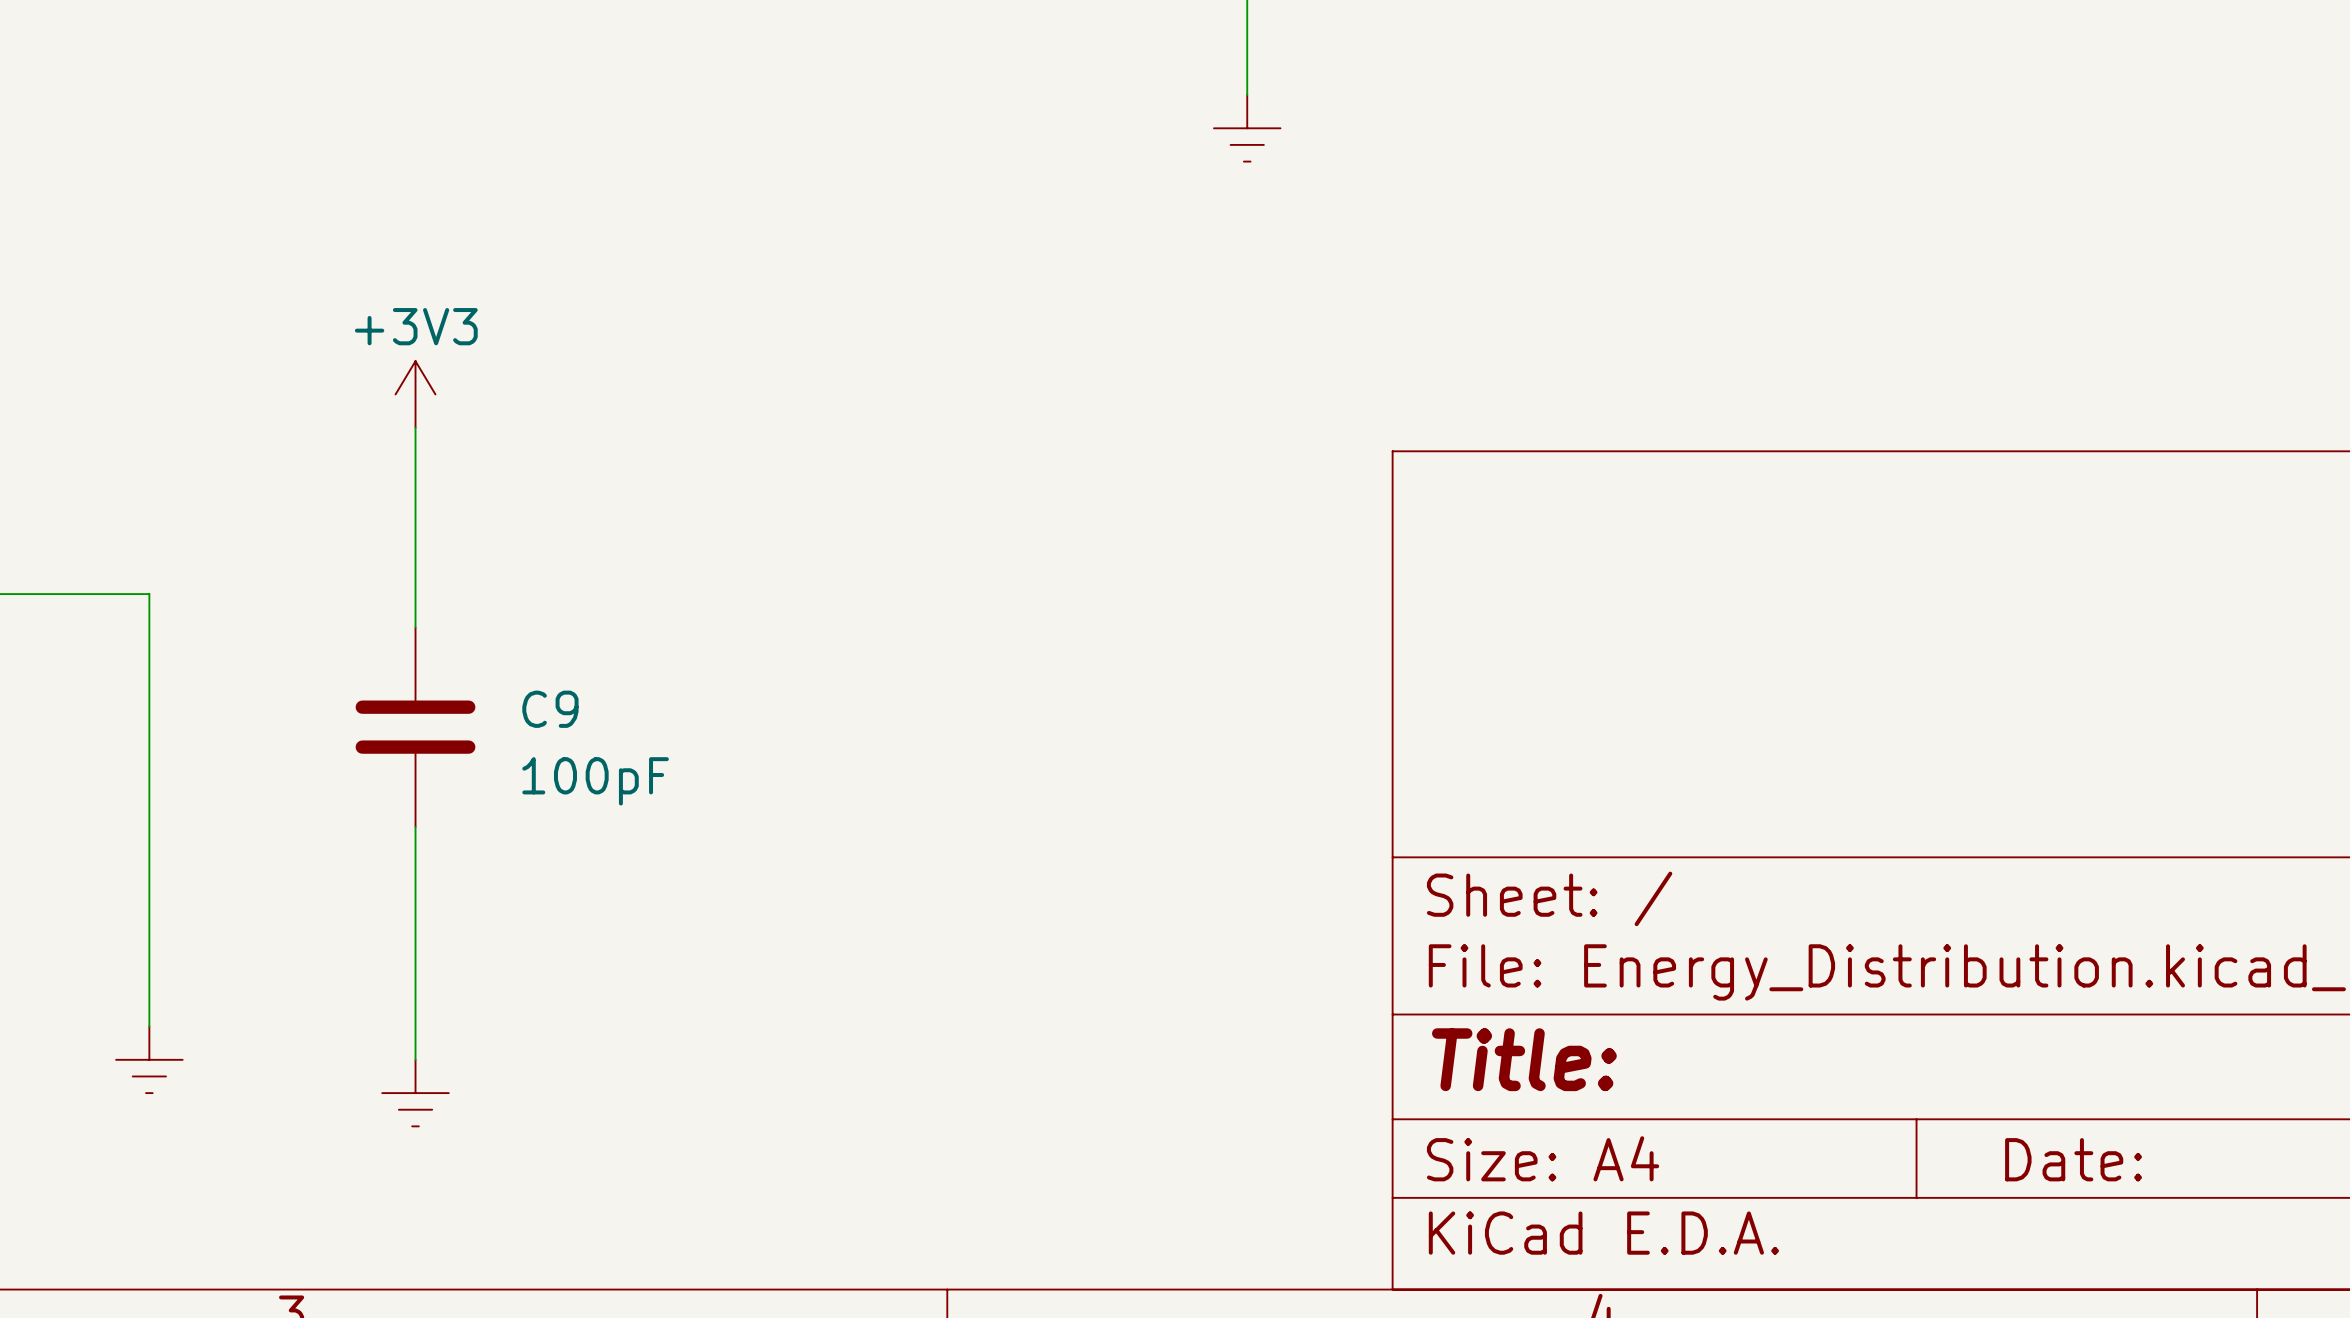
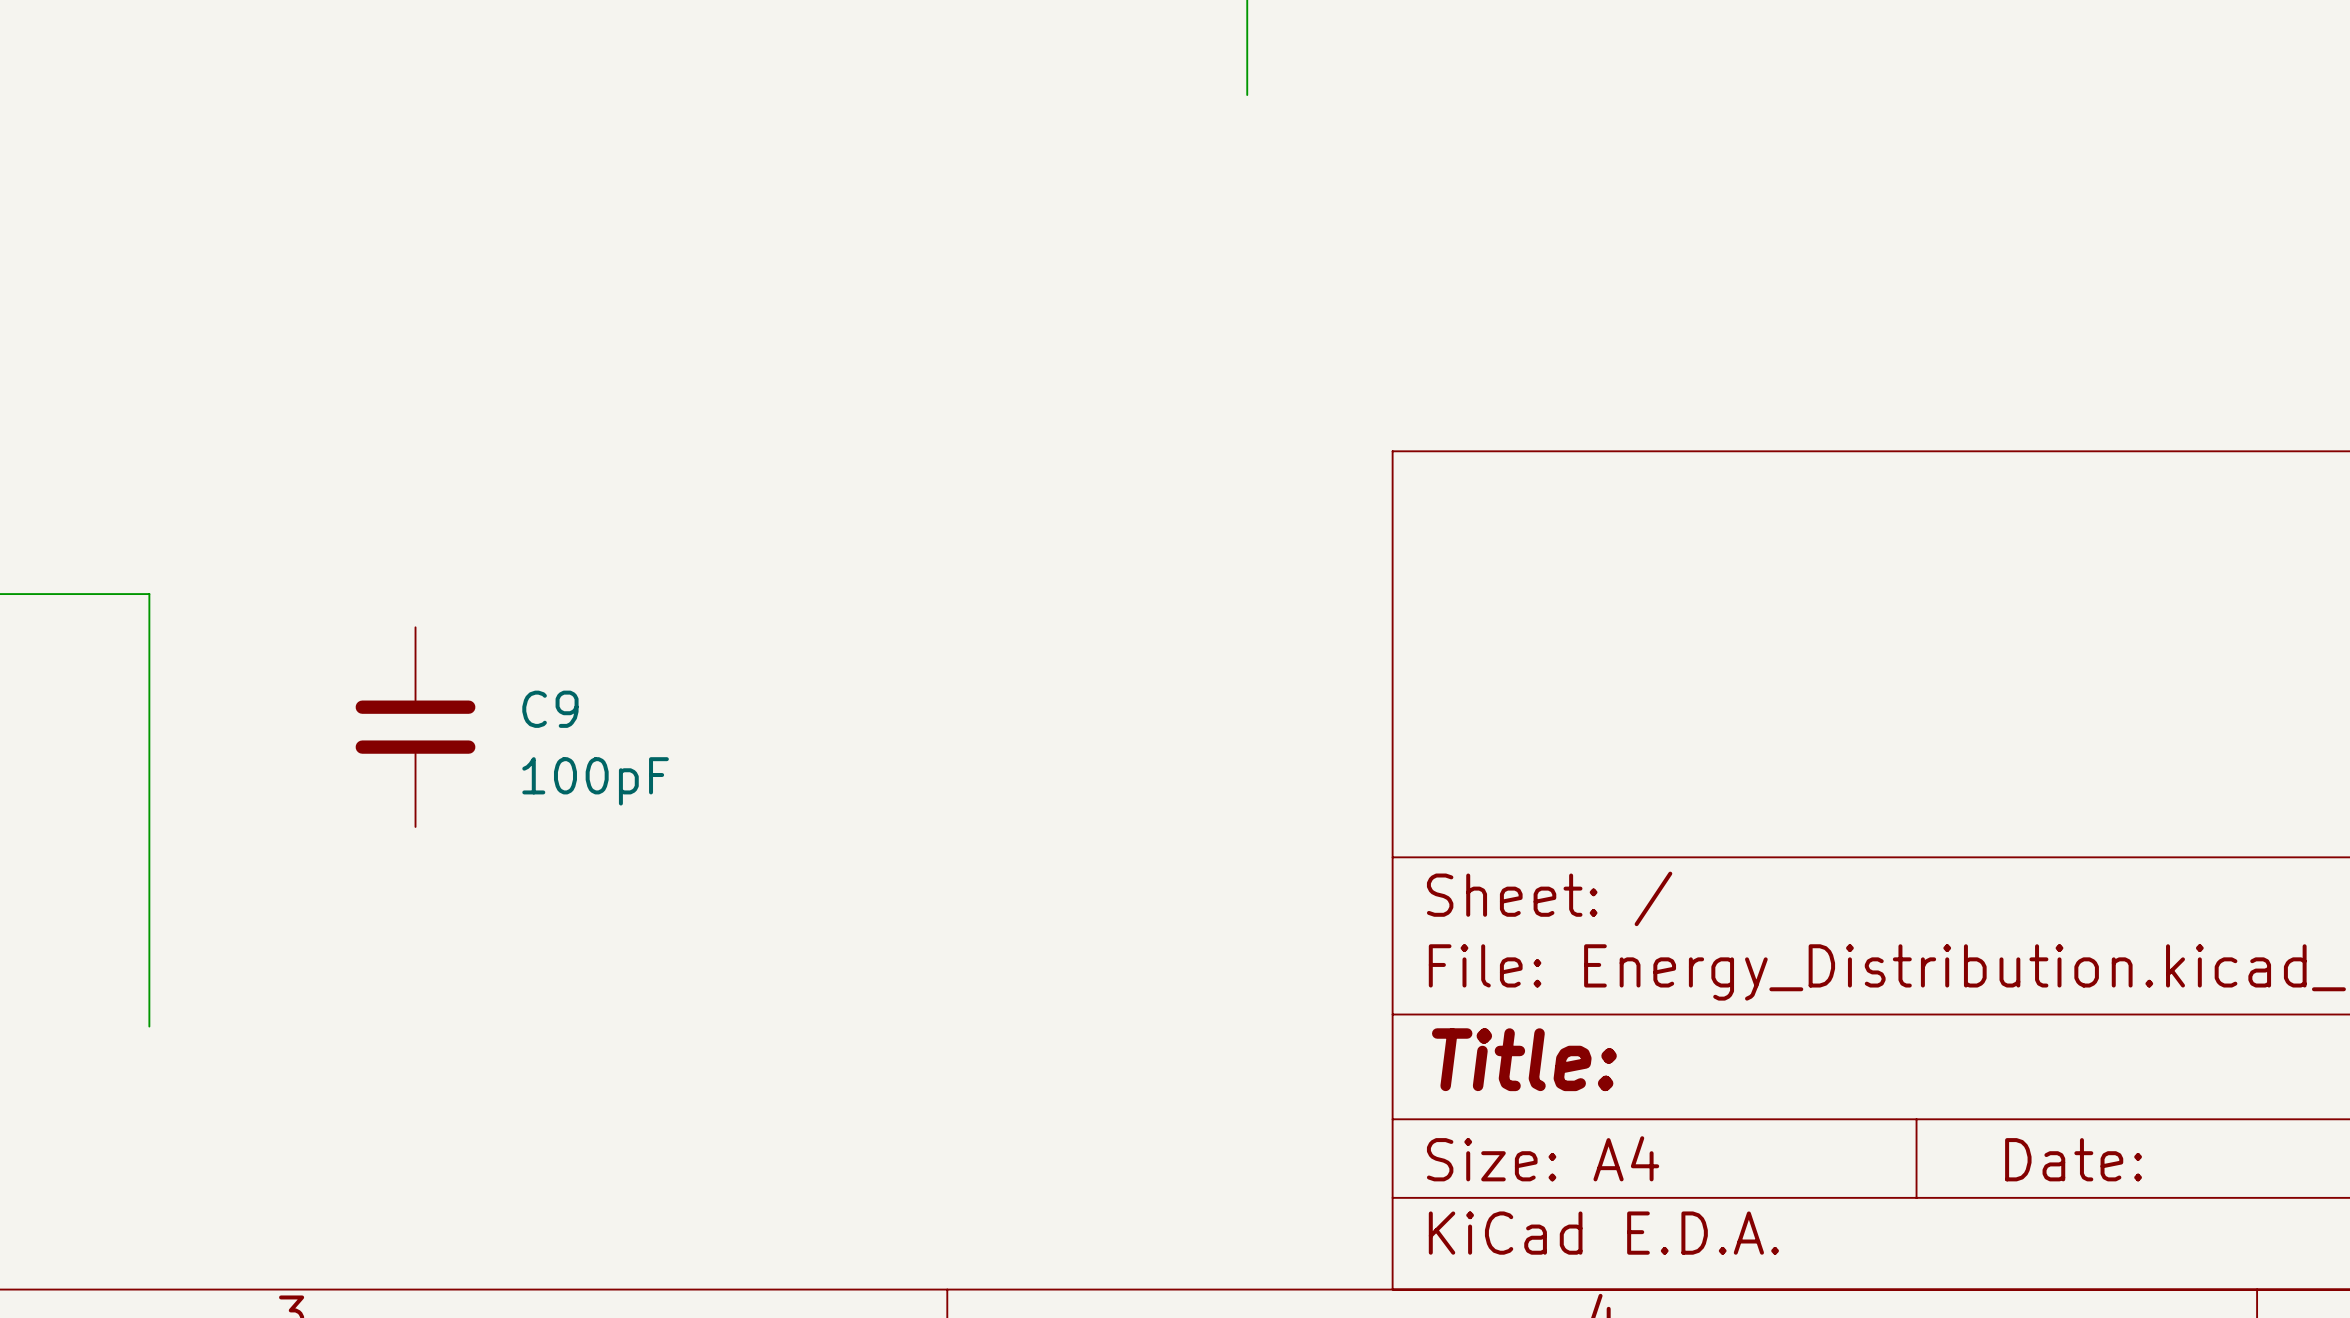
power symbol: (1247, 128) -> none
power symbol: +3V3 (415, 394) -> none
wire: (415, 427) (415, 627) -> none
wire: (415, 826) (415, 1059) -> none
power symbol: (149, 1059) -> none
power symbol: (415, 1093) -> none

